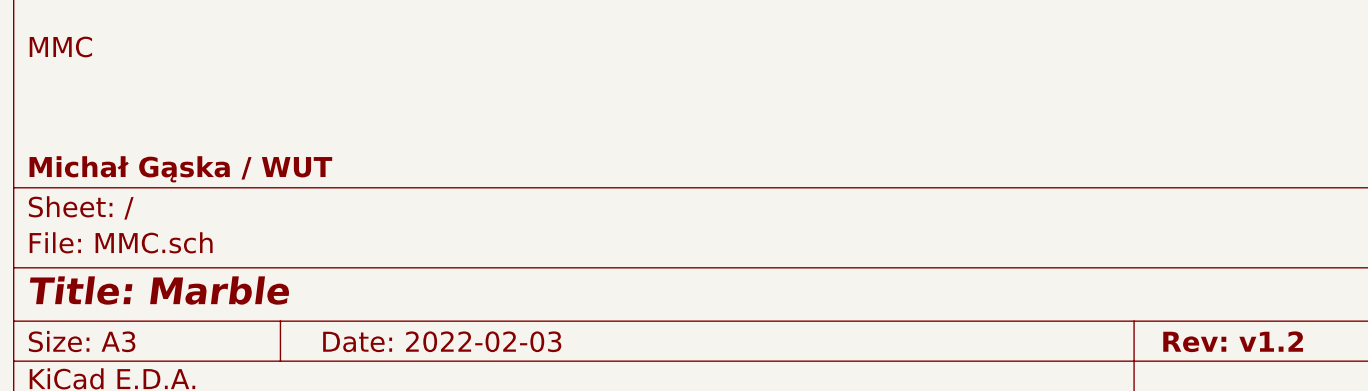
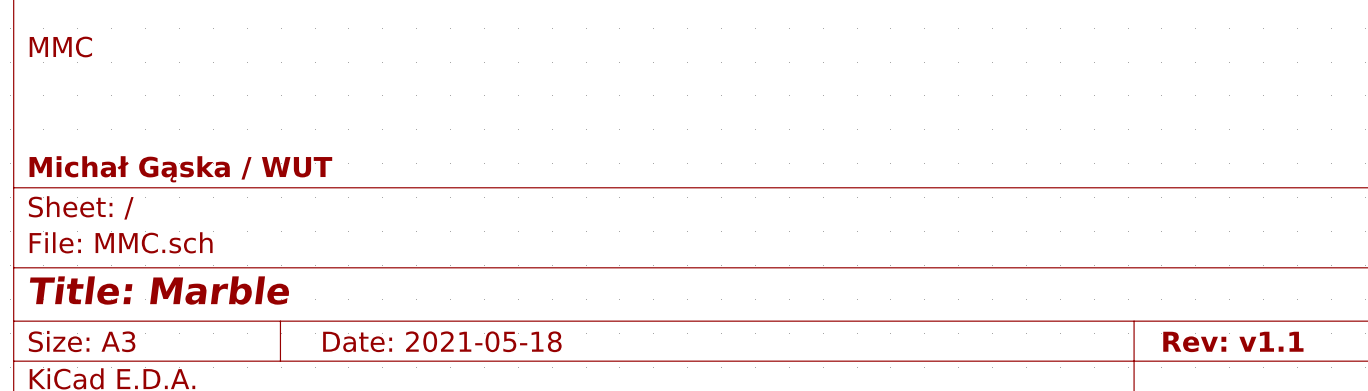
title block: Date: 2022-02-03 (442, 341) -> Date: 2021-05-18 (442, 341)
title block: Rev: v1.2 (1233, 341) -> Rev: v1.1 (1233, 341)

